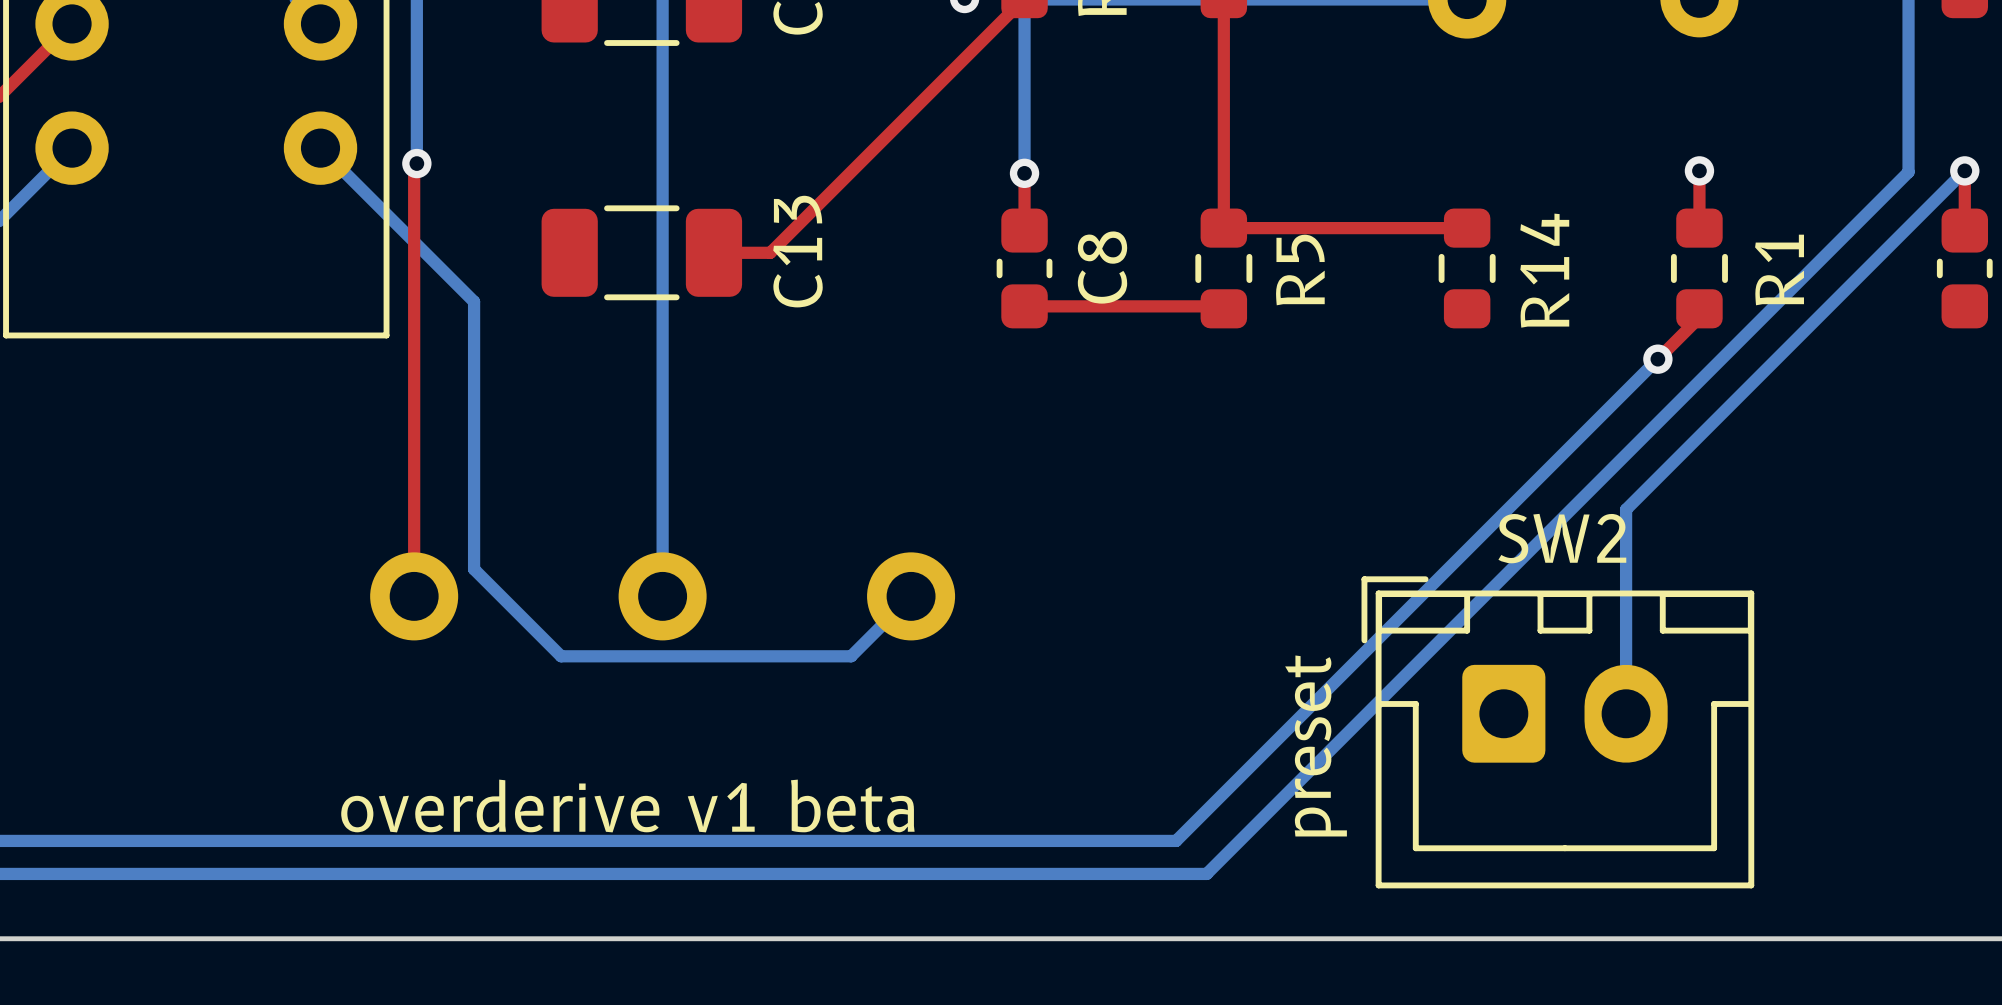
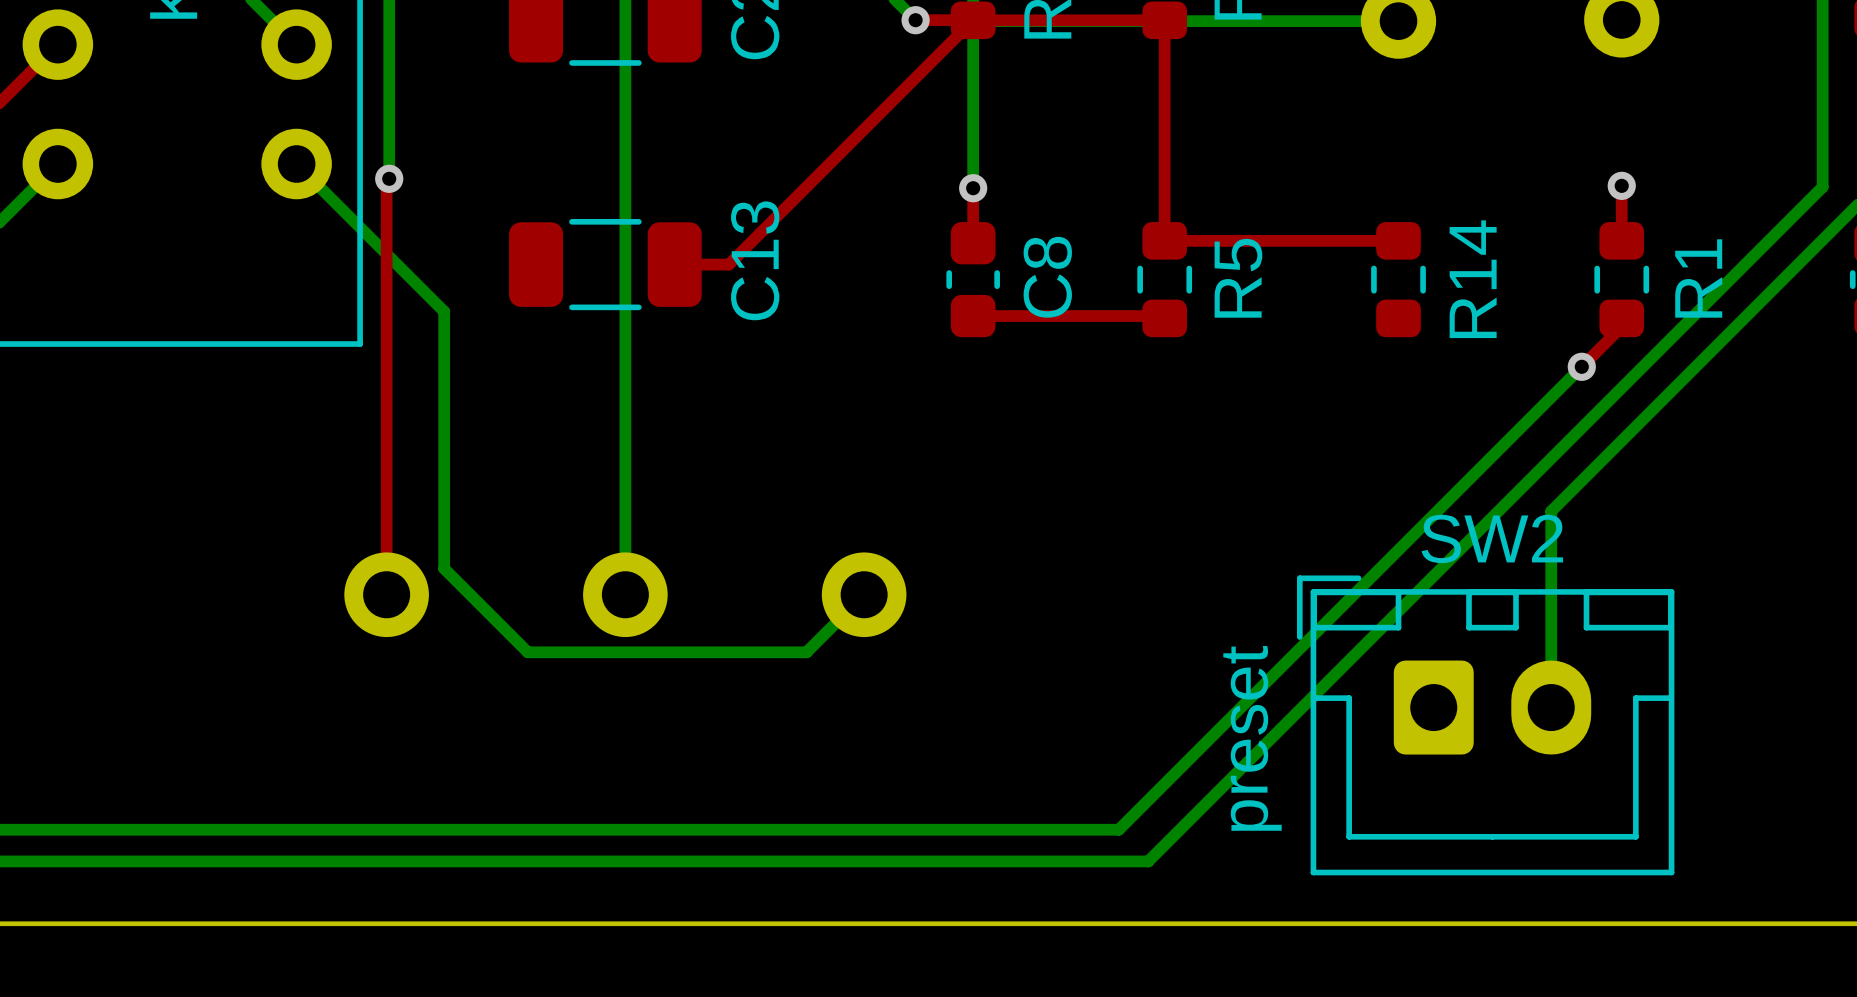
text: overderive v1 beta (627, 806) -> none

